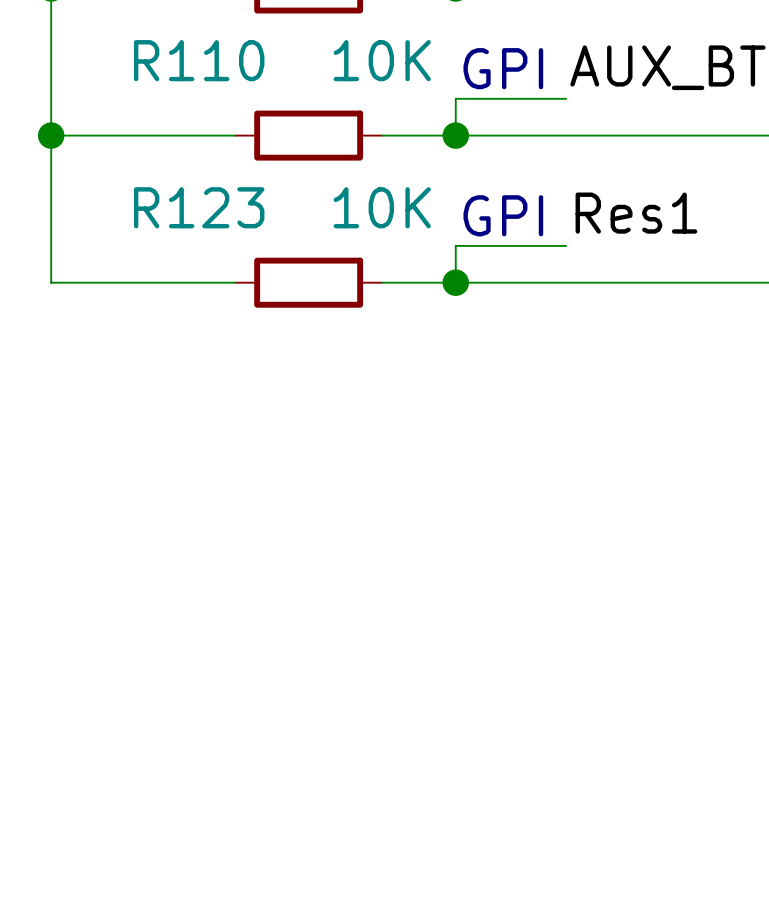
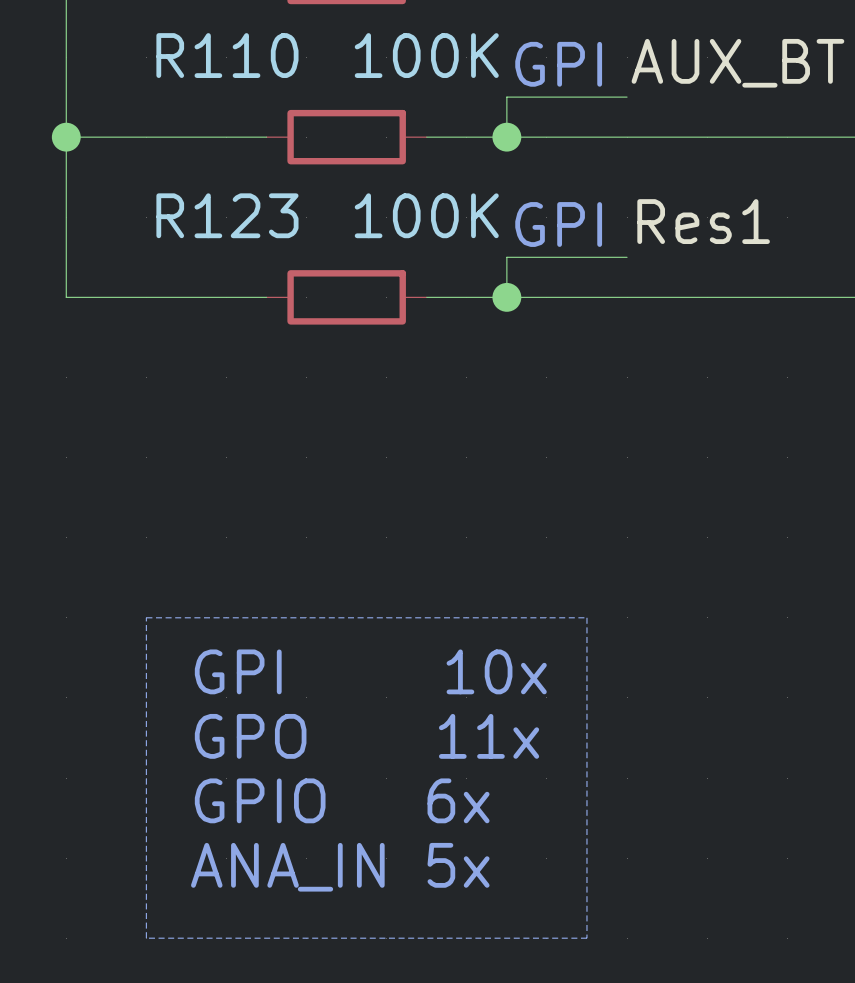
R110 value: 10K (382, 60) -> 100K (426, 55)
R123 value: 10K (382, 207) -> 100K (426, 215)
line: none -> (146, 617) (586, 617) (586, 938) (146, 938) (146, 617)
text: none -> GPI 10x (370, 671)
text: none -> GPO 11x (366, 736)
text: none -> GPIO 6x (342, 800)
text: none -> ANA_IN 5x (340, 867)

